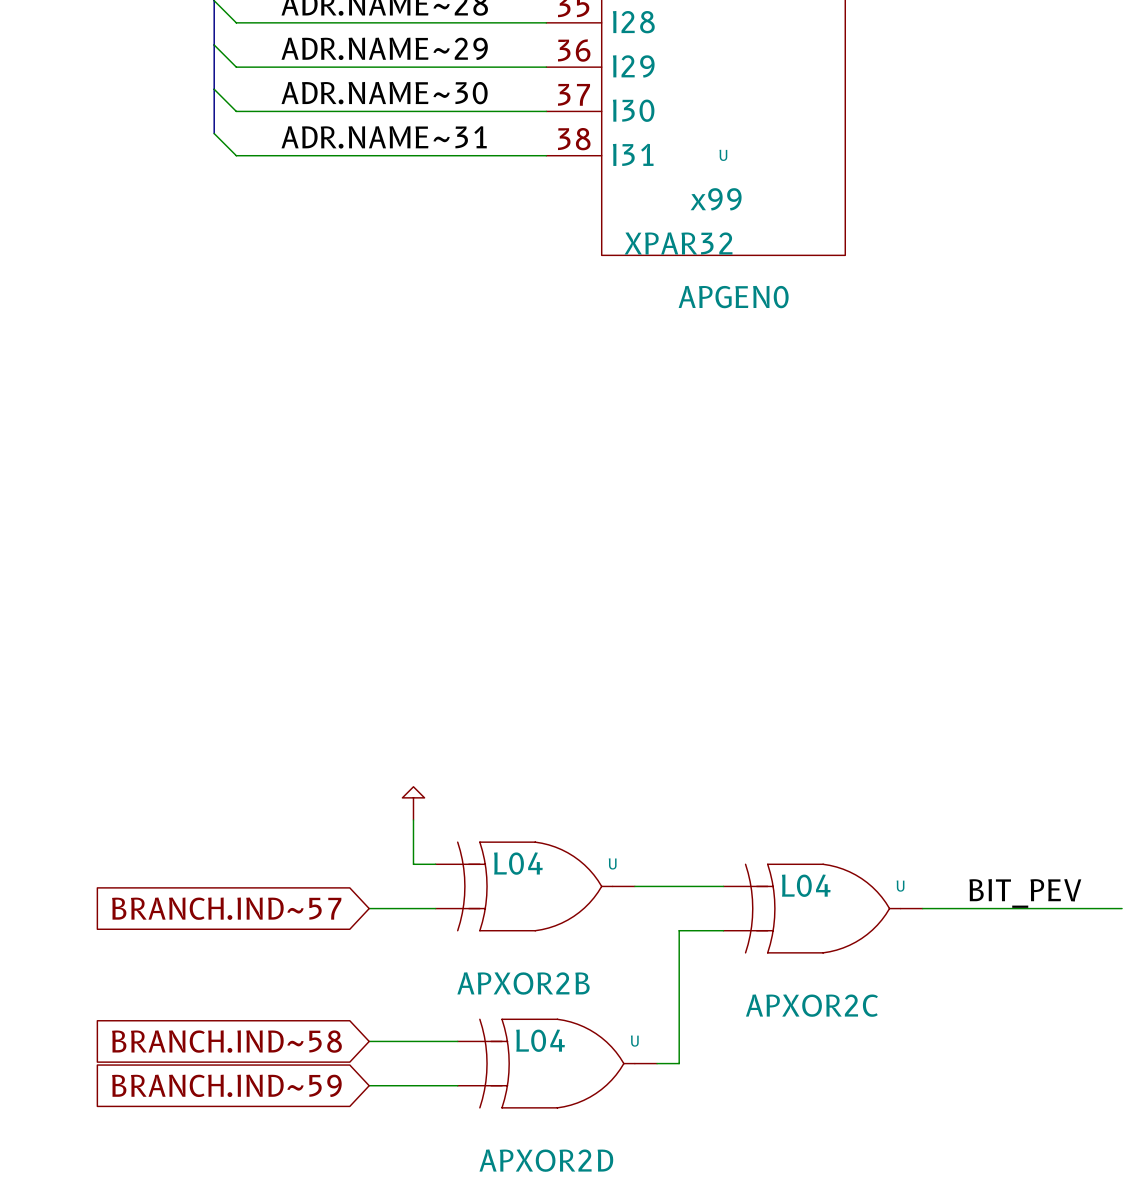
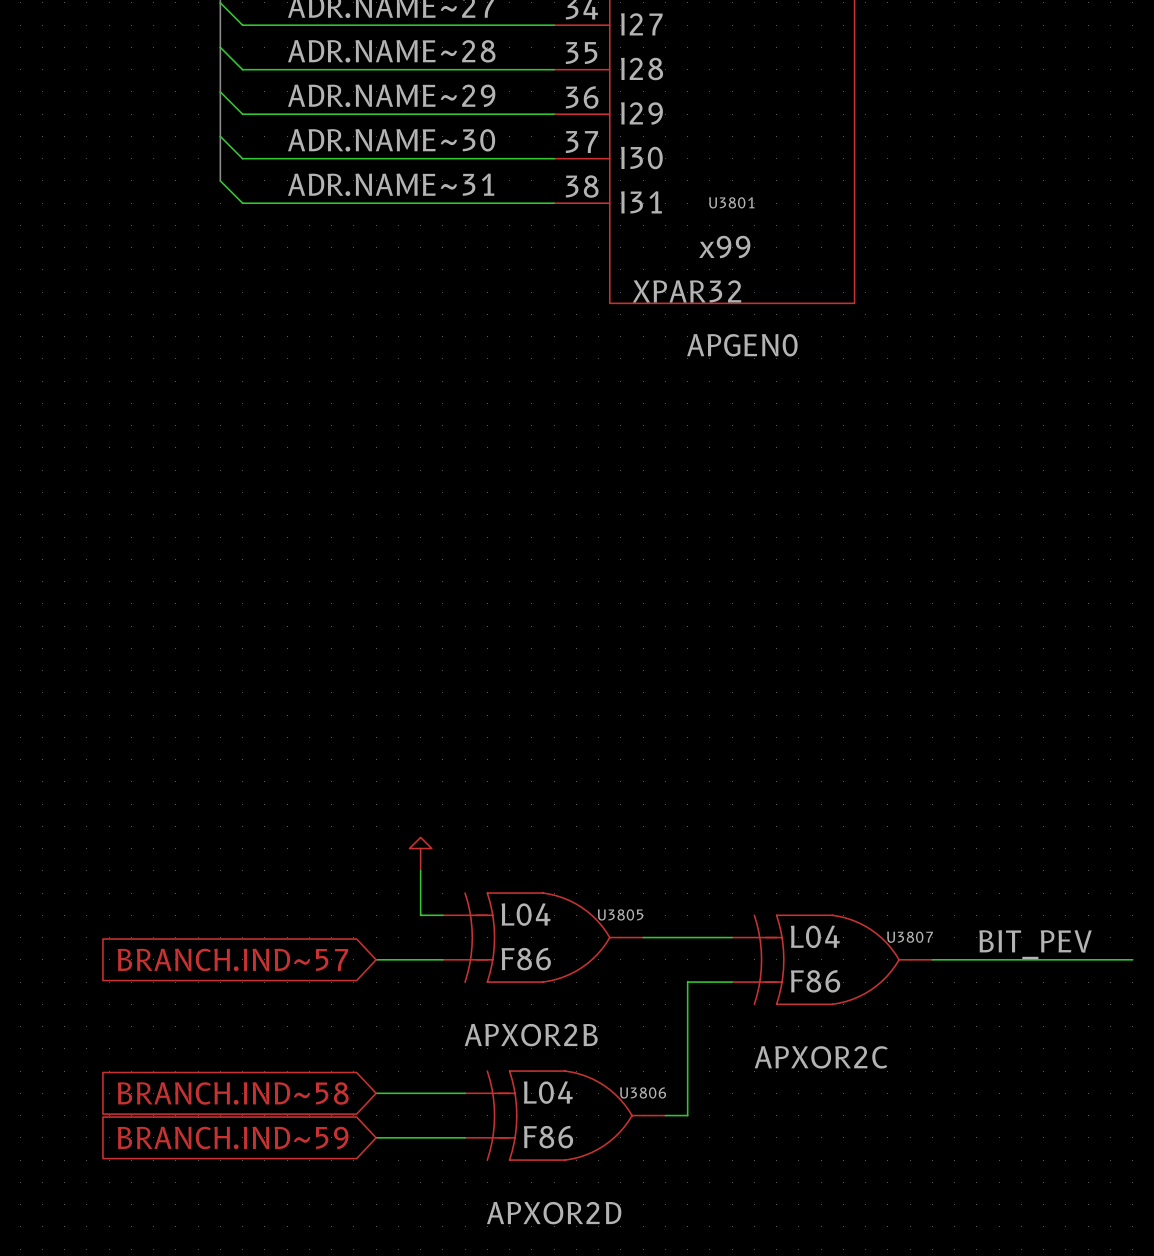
U name: U (723, 155) -> U3801 (731, 202)
U name: U (612, 863) -> U3805 (620, 914)
U name: U (900, 886) -> U3807 (910, 937)
U value: none -> F86 (526, 959)
U value: none -> F86 (815, 981)
U name: U (634, 1041) -> U3806 (643, 1092)
U value: none -> F86 (548, 1137)

